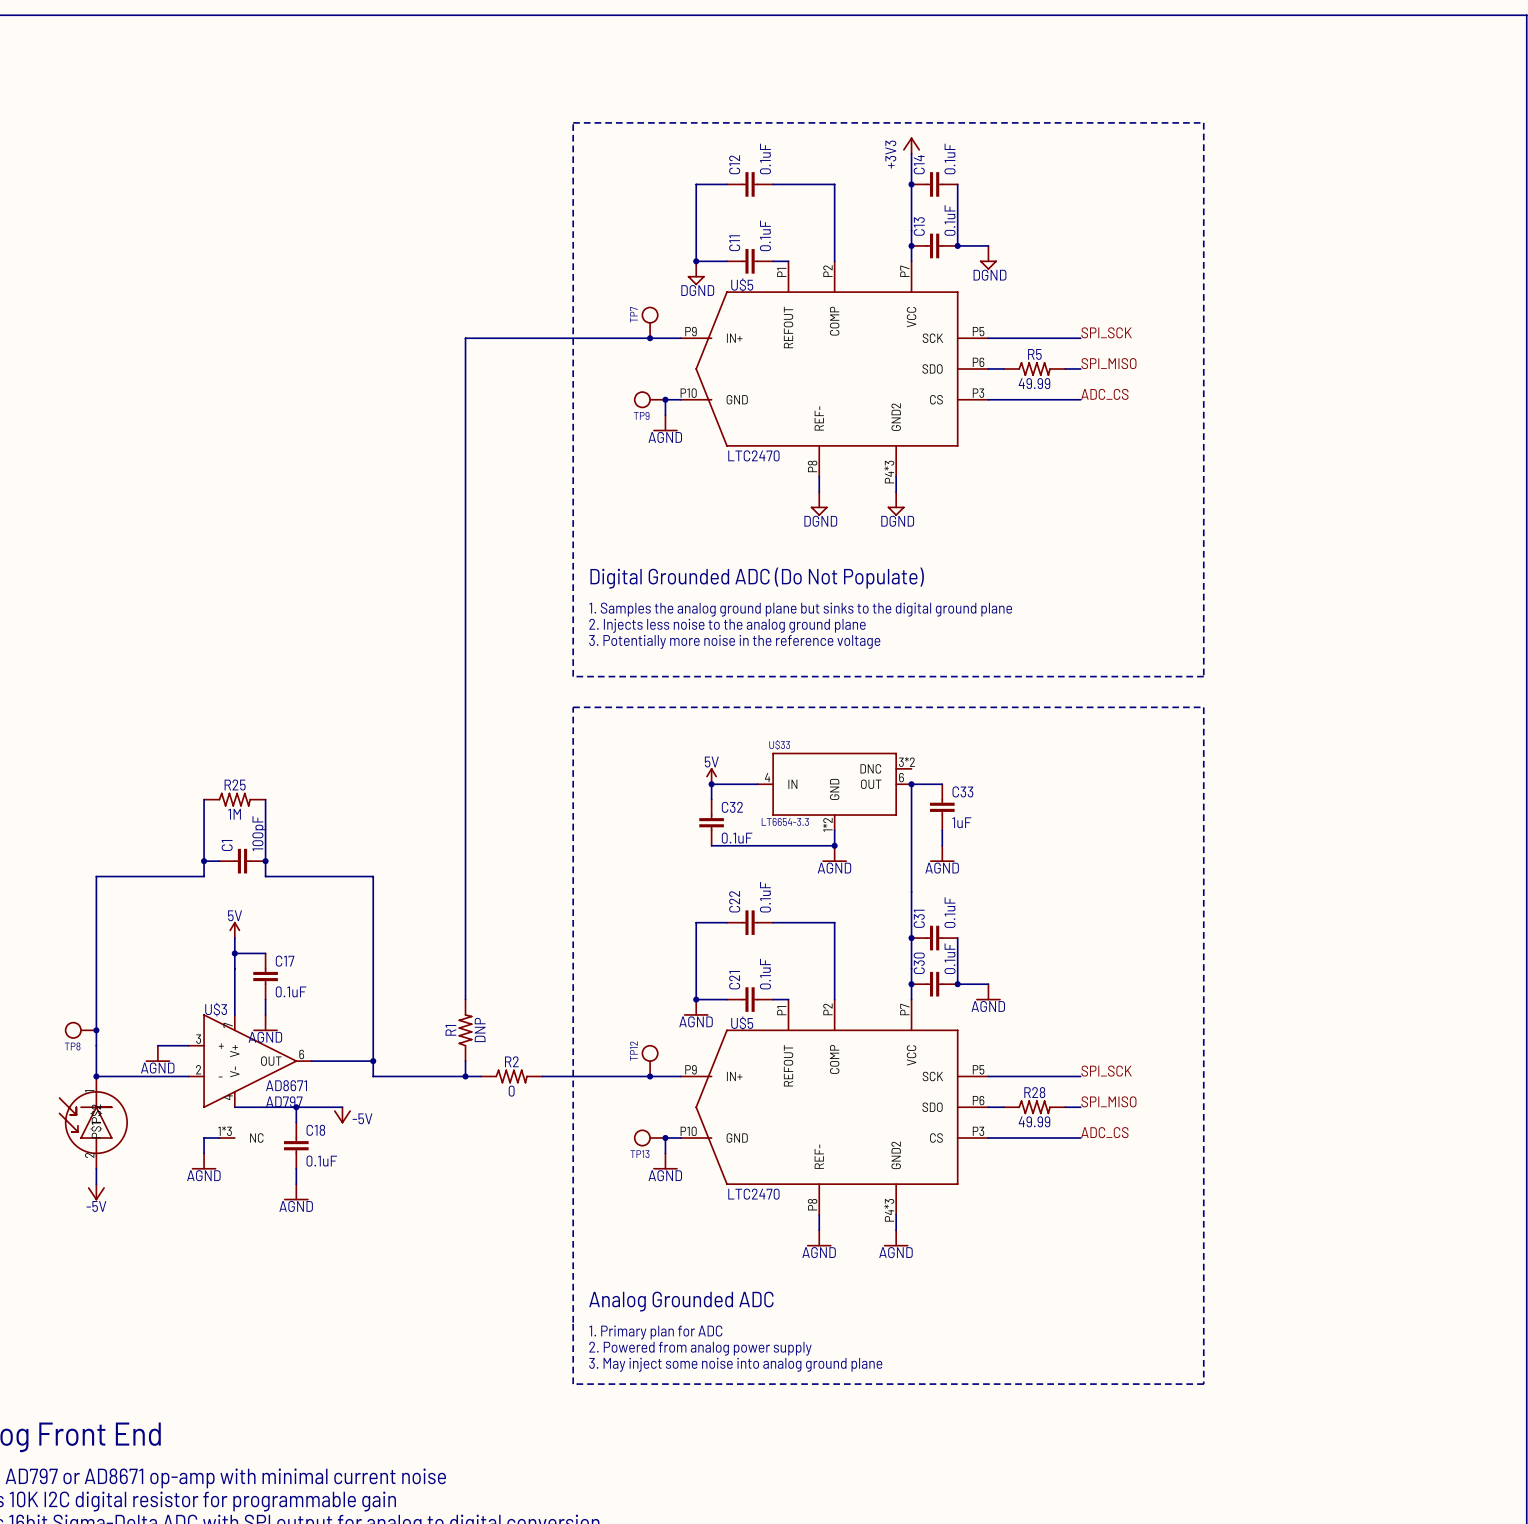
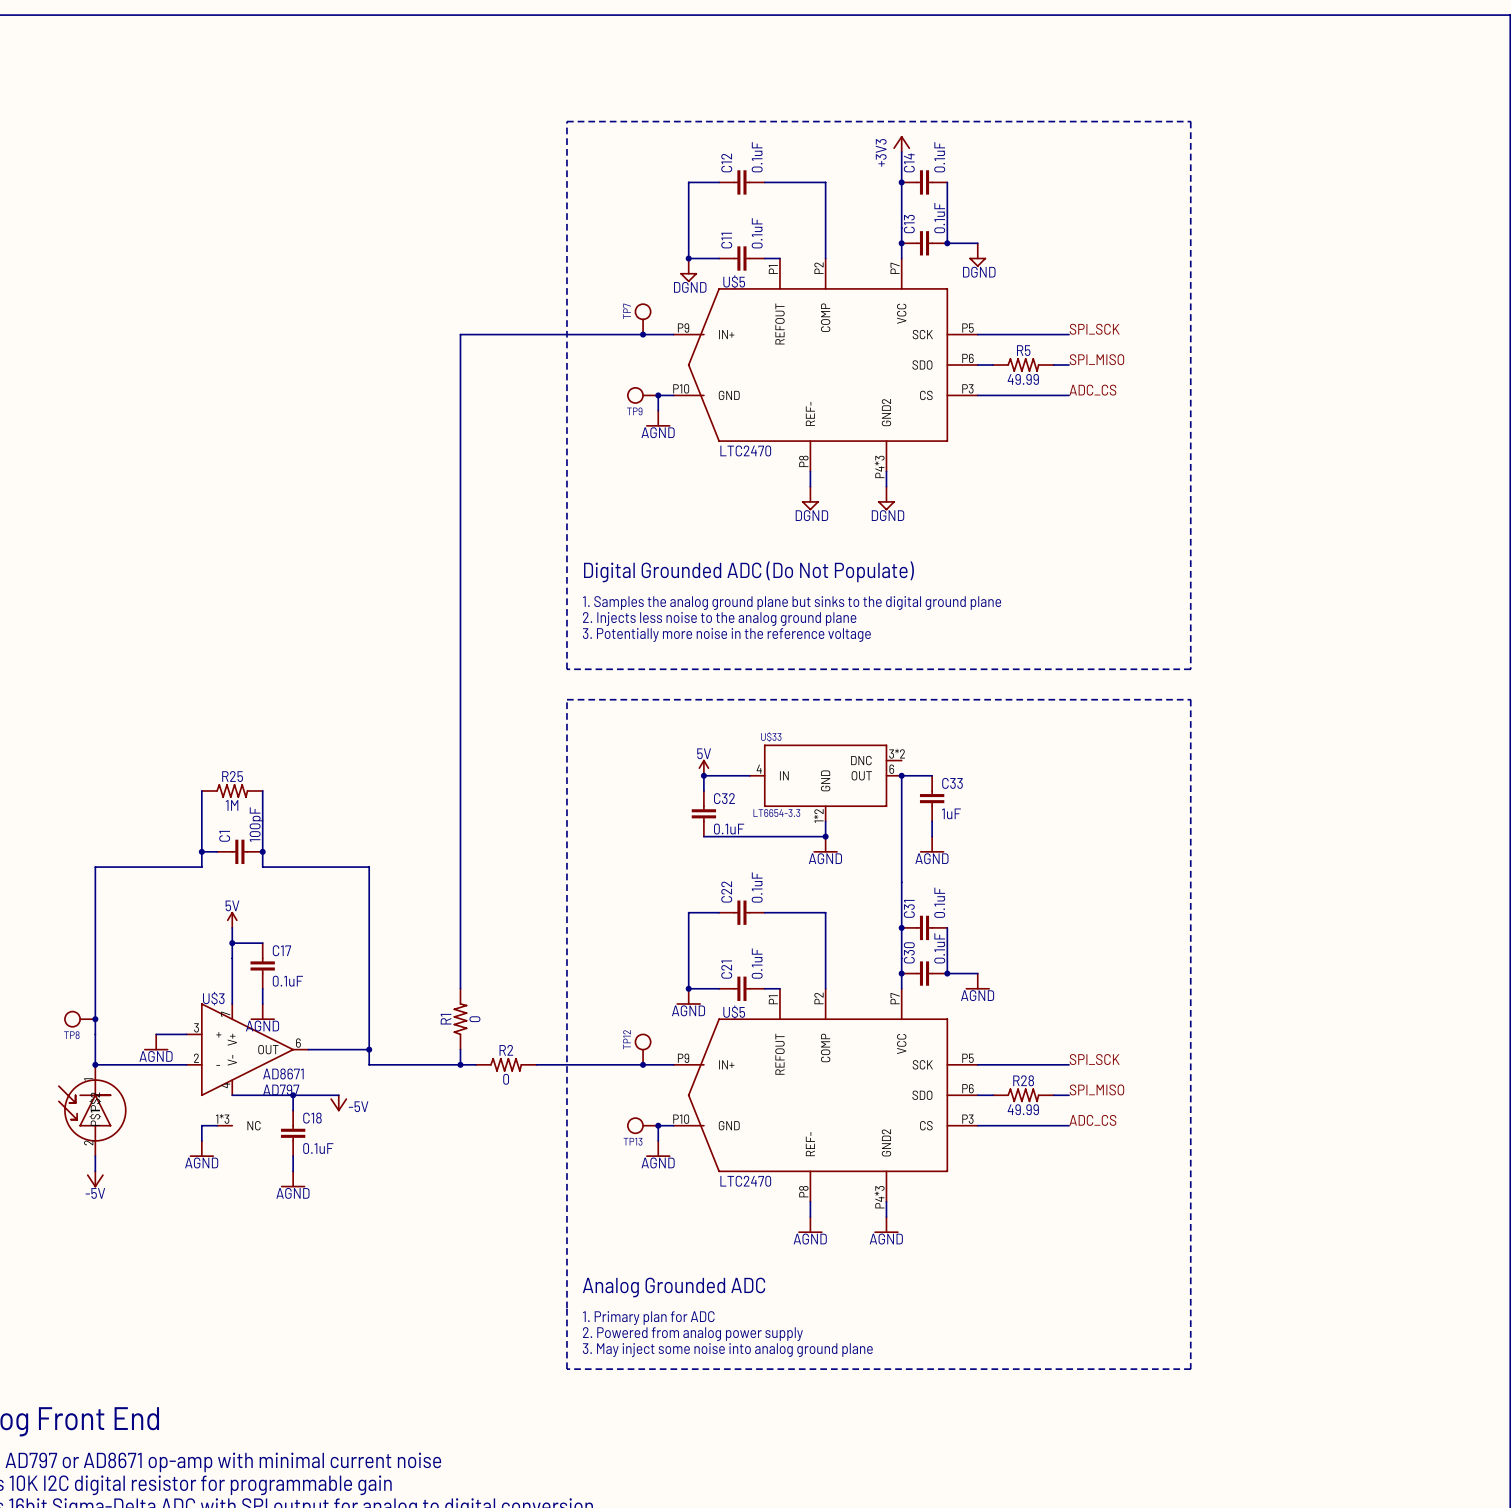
R1 value: DNP (480, 1029) -> 0 (474, 1019)

